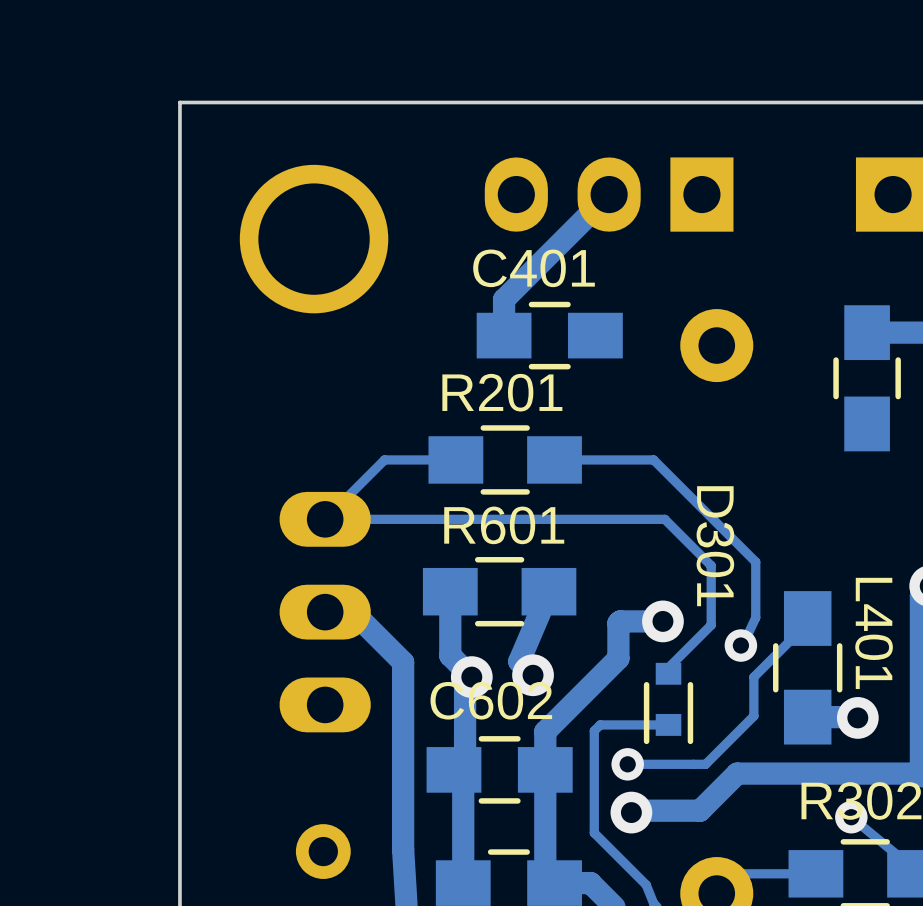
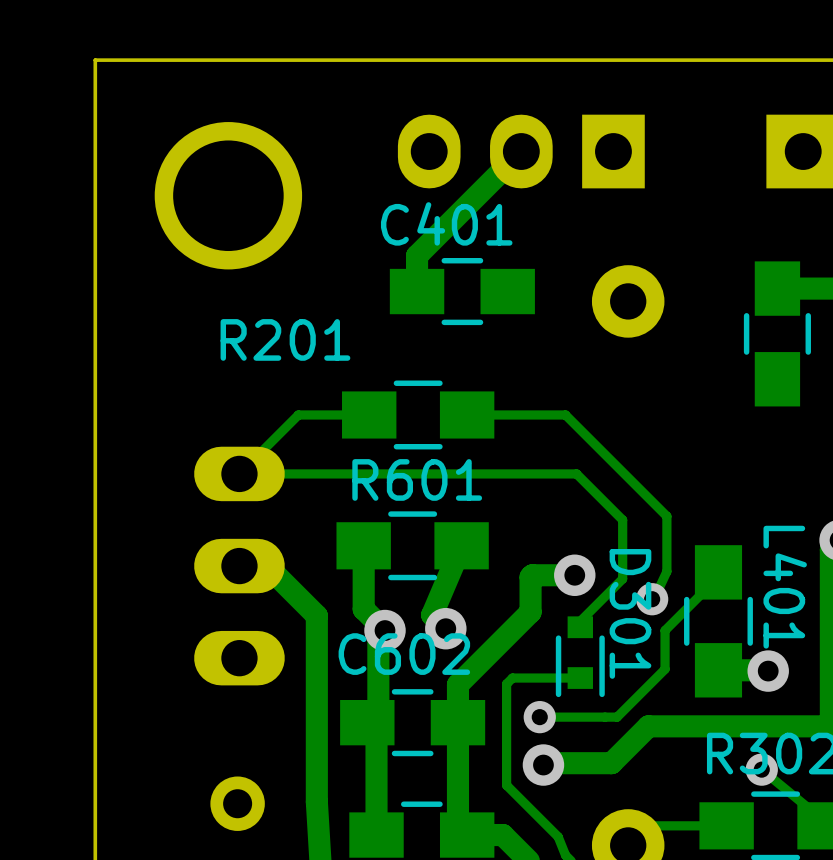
R201 name position: R201 (502, 392) -> R201 (285, 339)
D301 name position: D301 (715, 546) -> D301 (630, 613)

